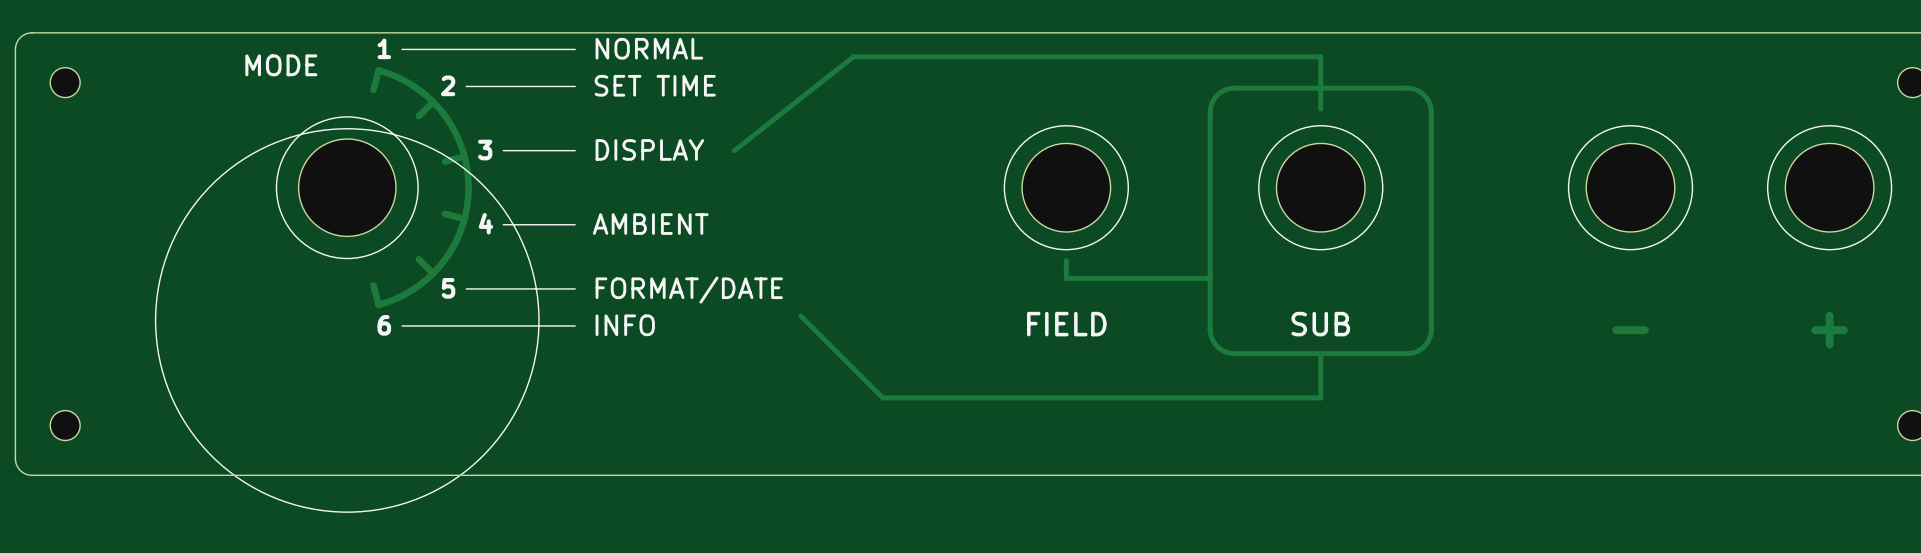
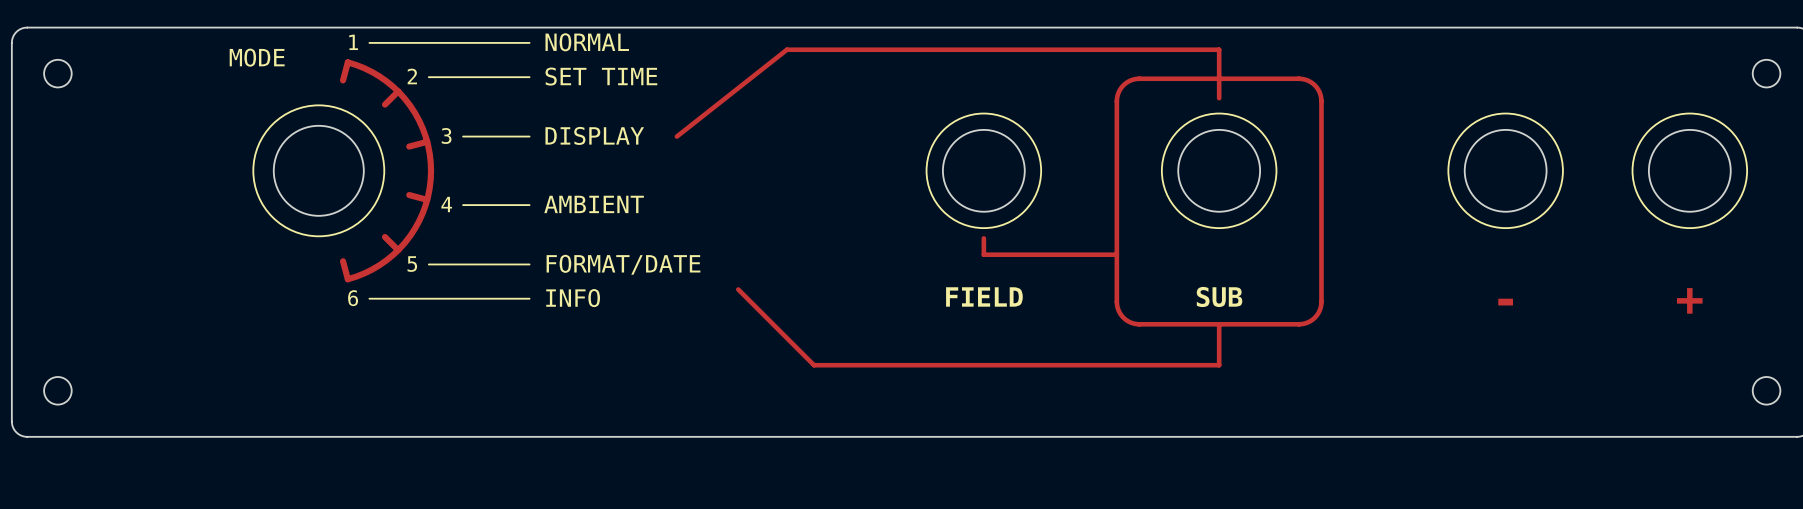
drawing: [154, 128, 540, 513] -> none

